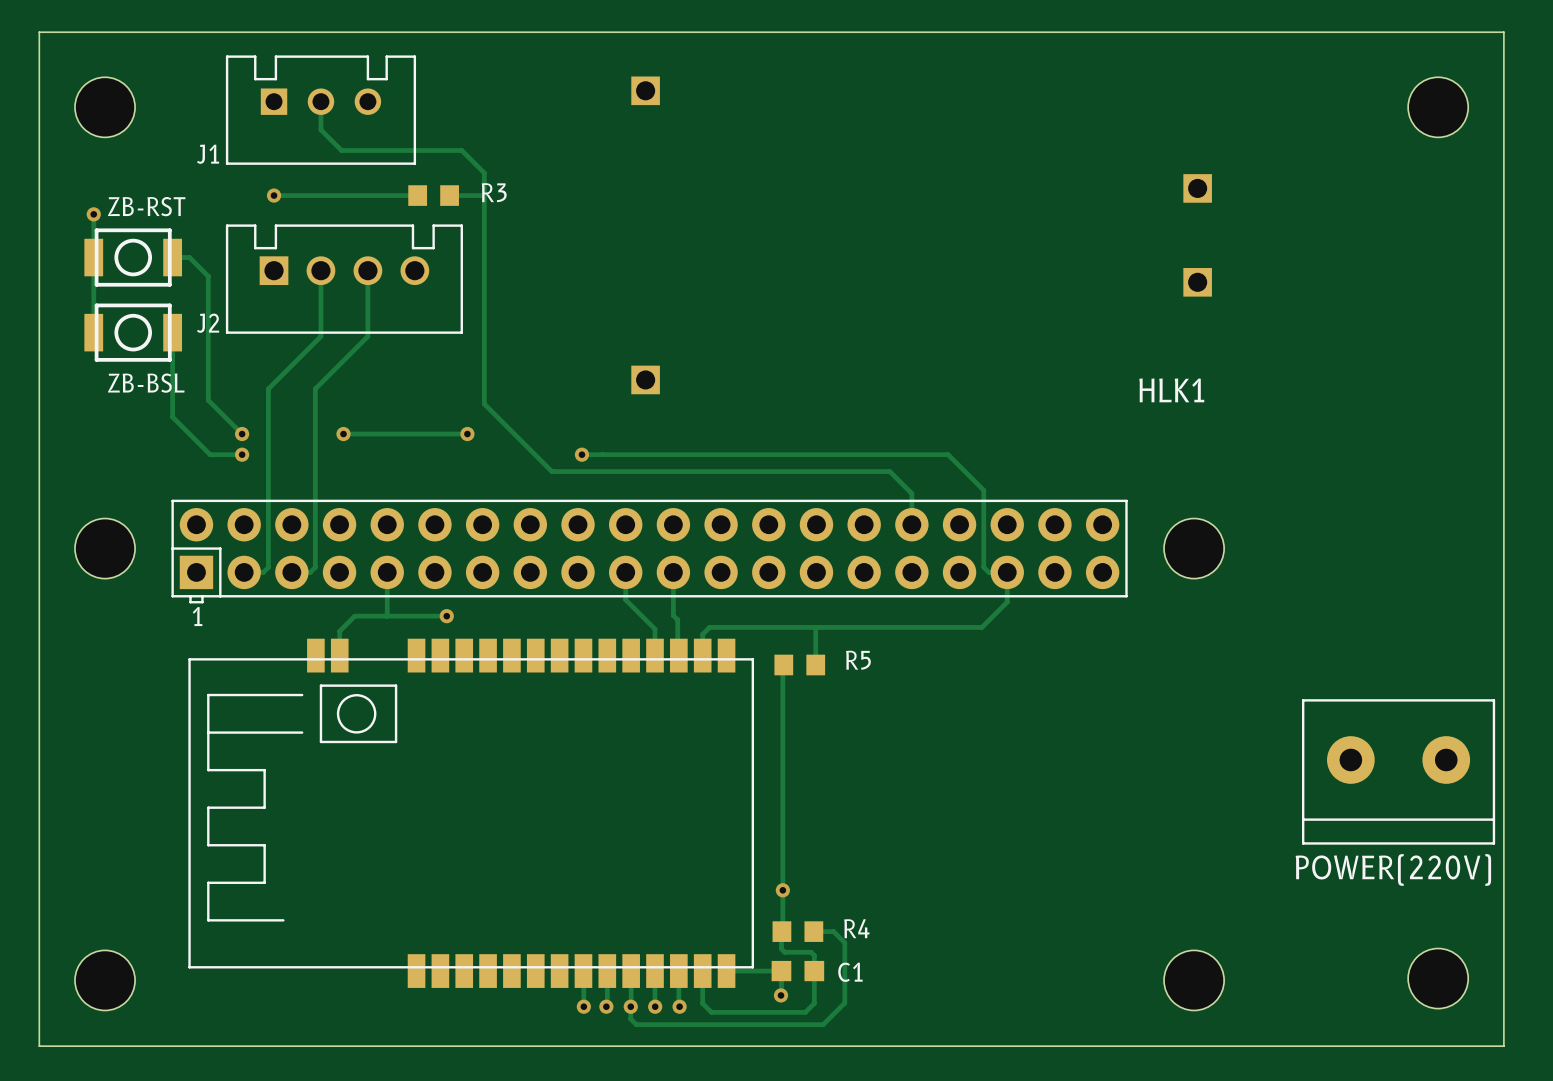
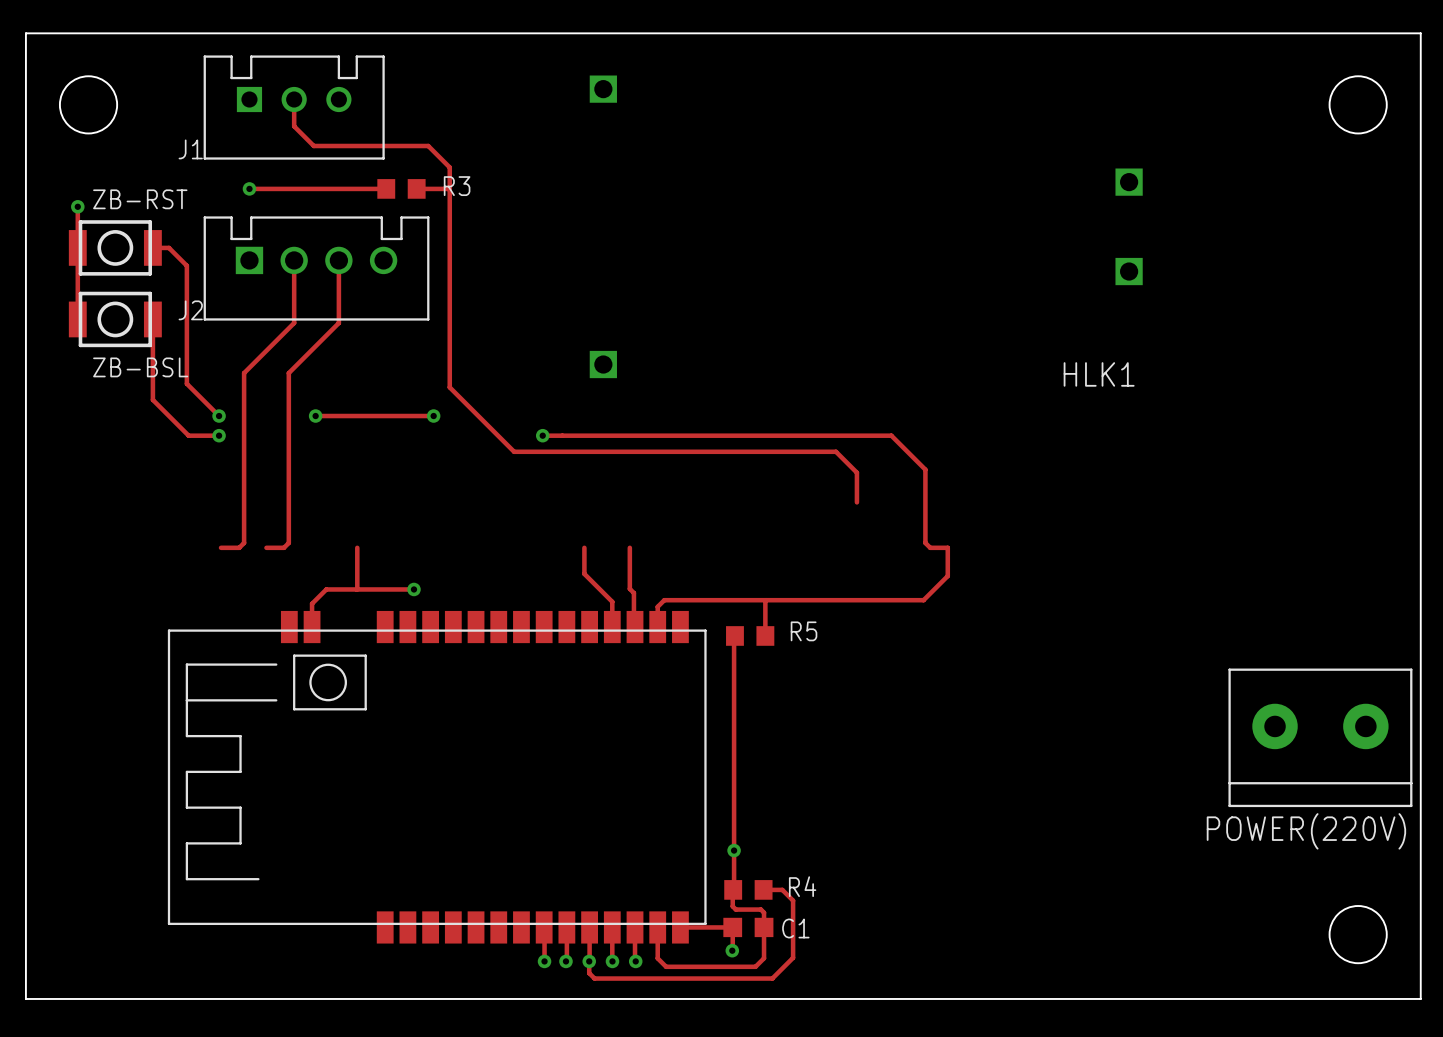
hole: (105, 548) -> none
hole: (1194, 548) -> none
part: (649, 551) -> none
hole: (105, 980) -> none
hole: (1194, 980) -> none

